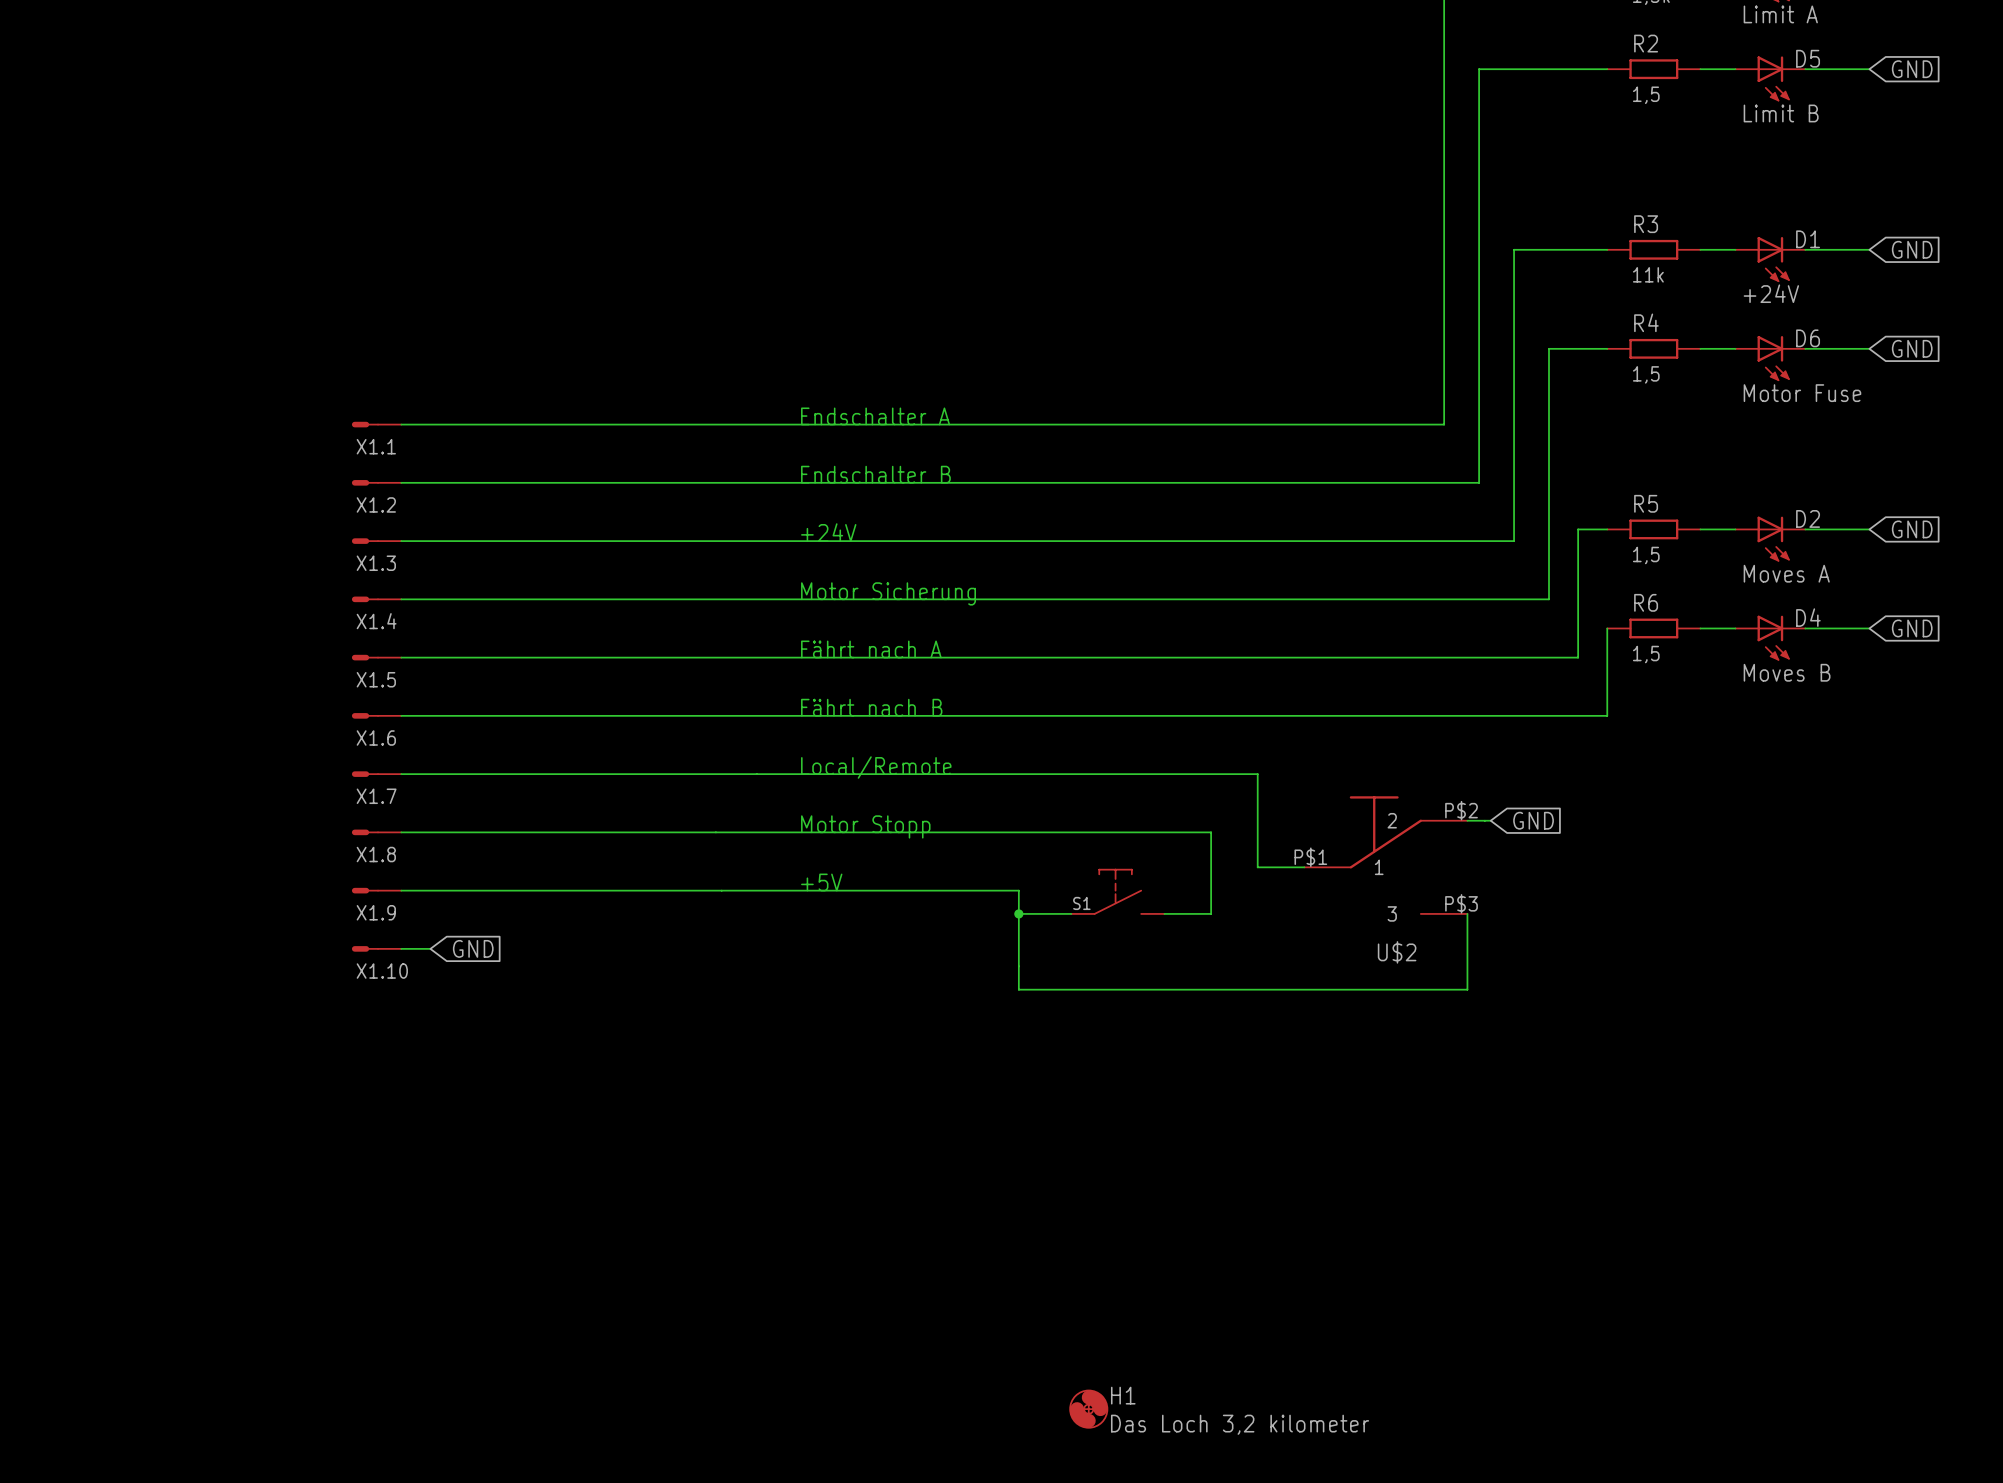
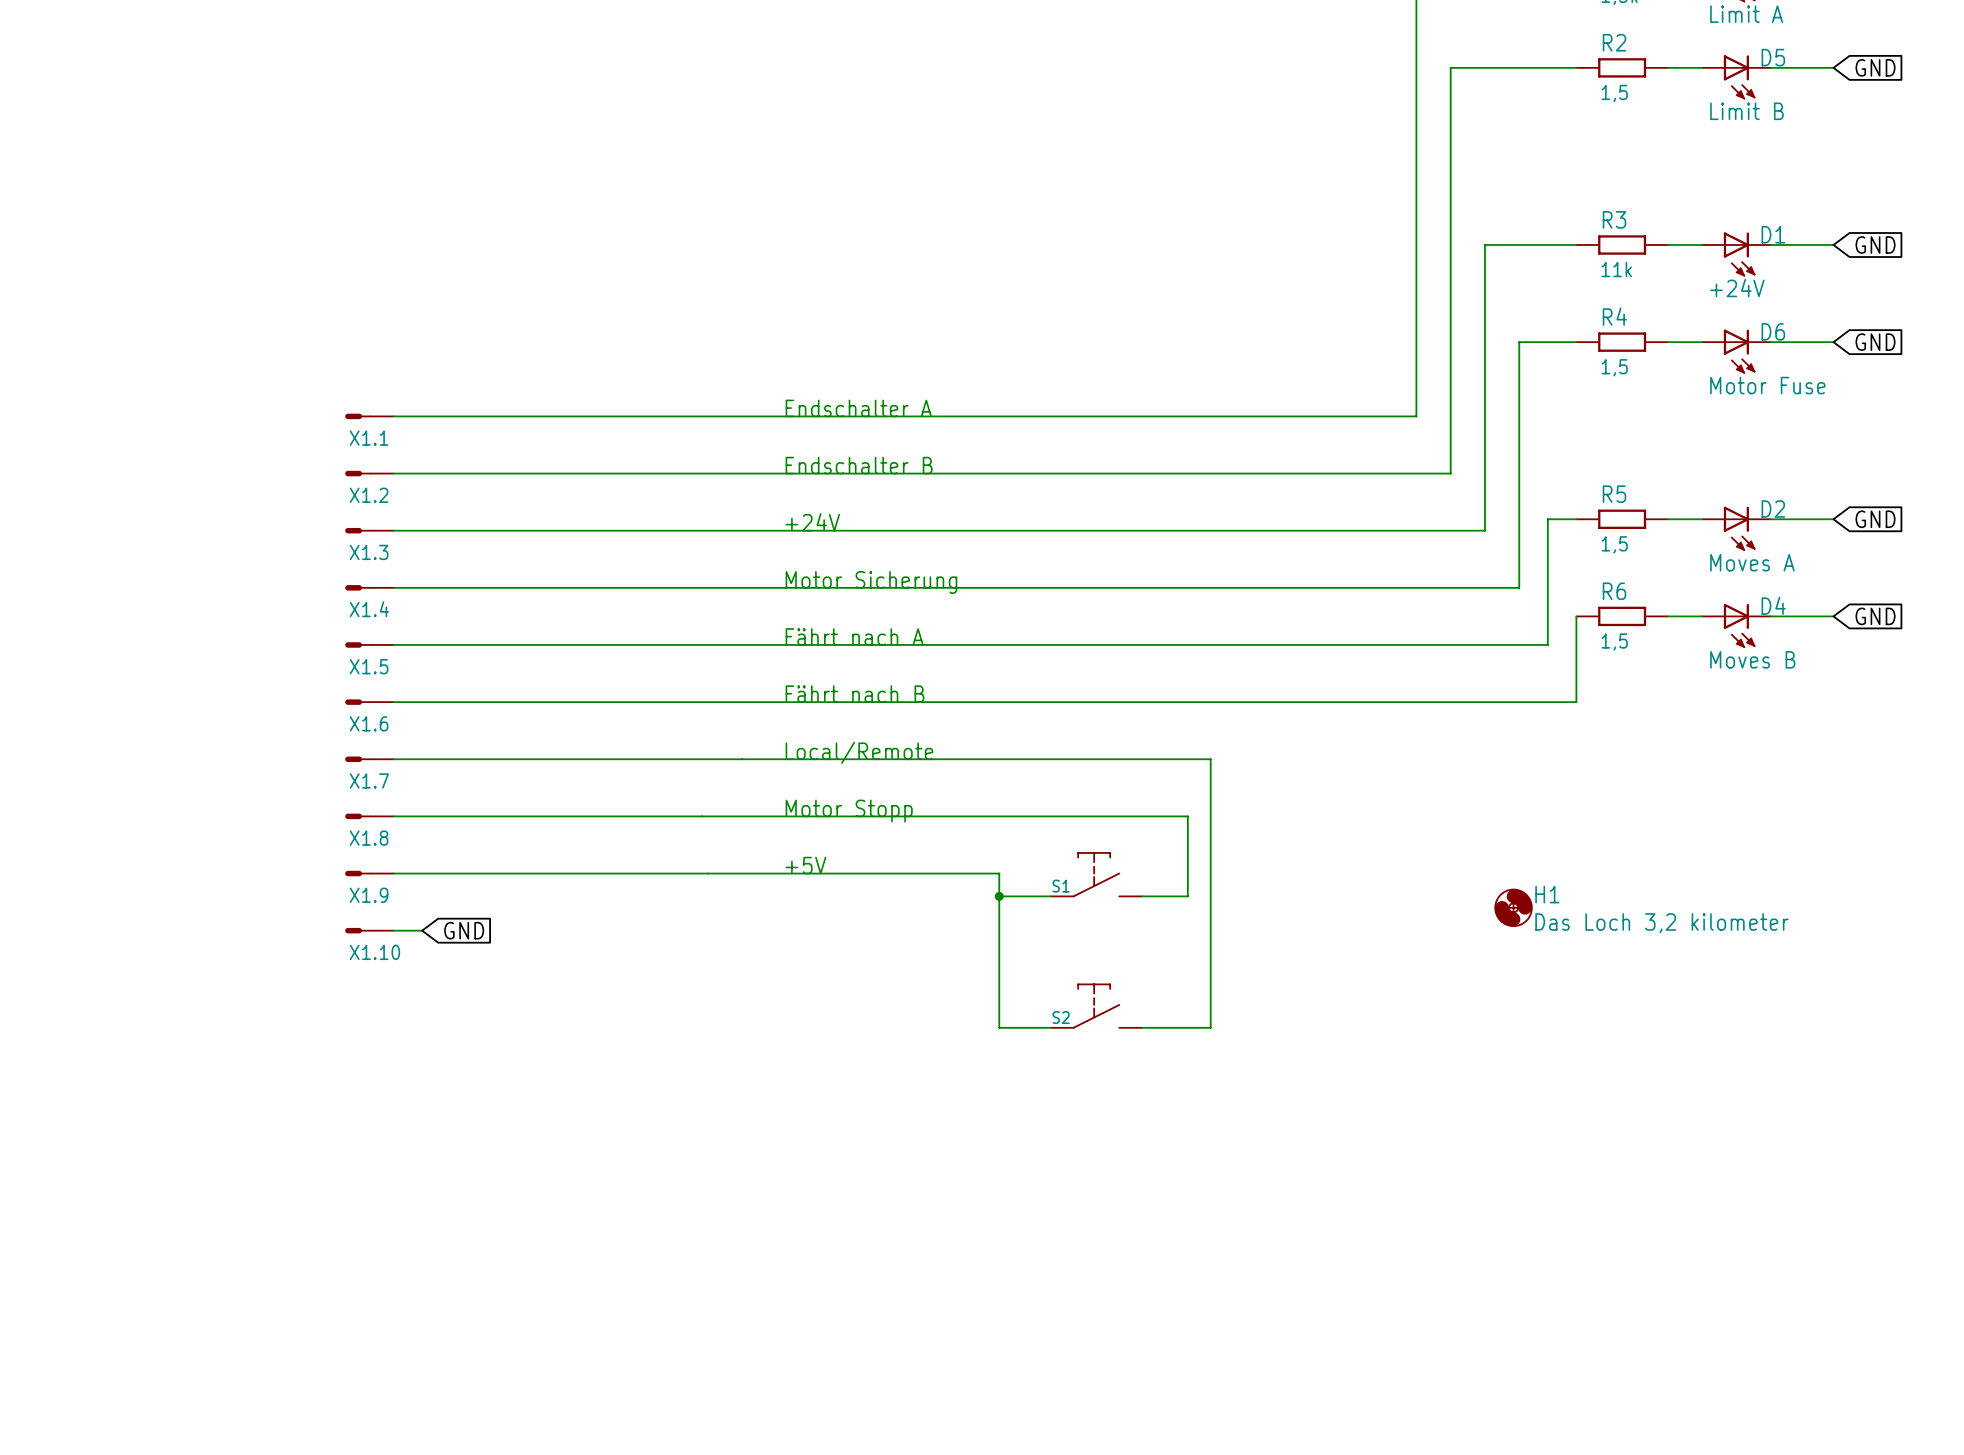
wire: (1234, 774) (1257, 774) (1257, 867) (1304, 867) -> (1210, 759) (1210, 1027) (1142, 1027)
wire: (1467, 820) (1490, 820) -> none
global label: GND (1533, 820) -> none
U$2: (1385, 855) -> none
wire: (1467, 913) (1467, 989) (1018, 989) -> (1050, 1027) (999, 1027) (999, 970)
S2: none -> (1096, 1006)
H1 position: (1088, 1409) -> (1513, 907)

